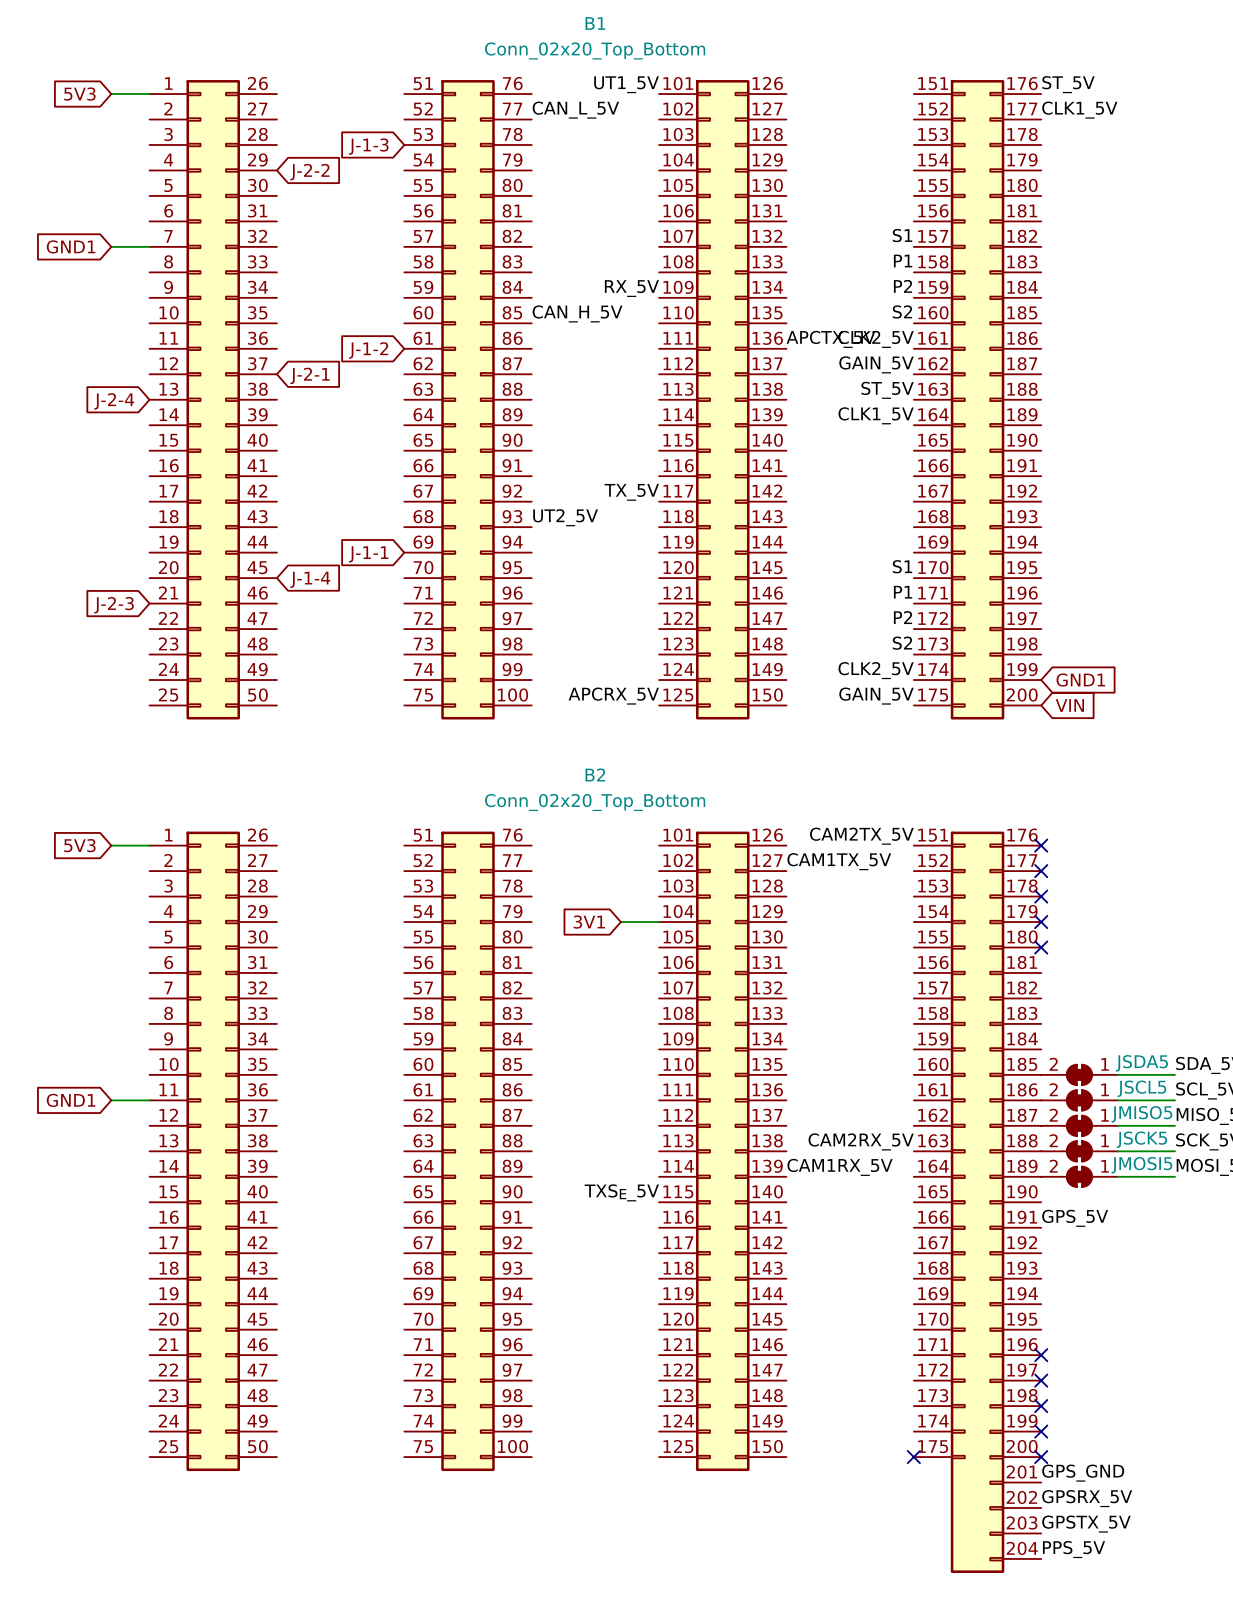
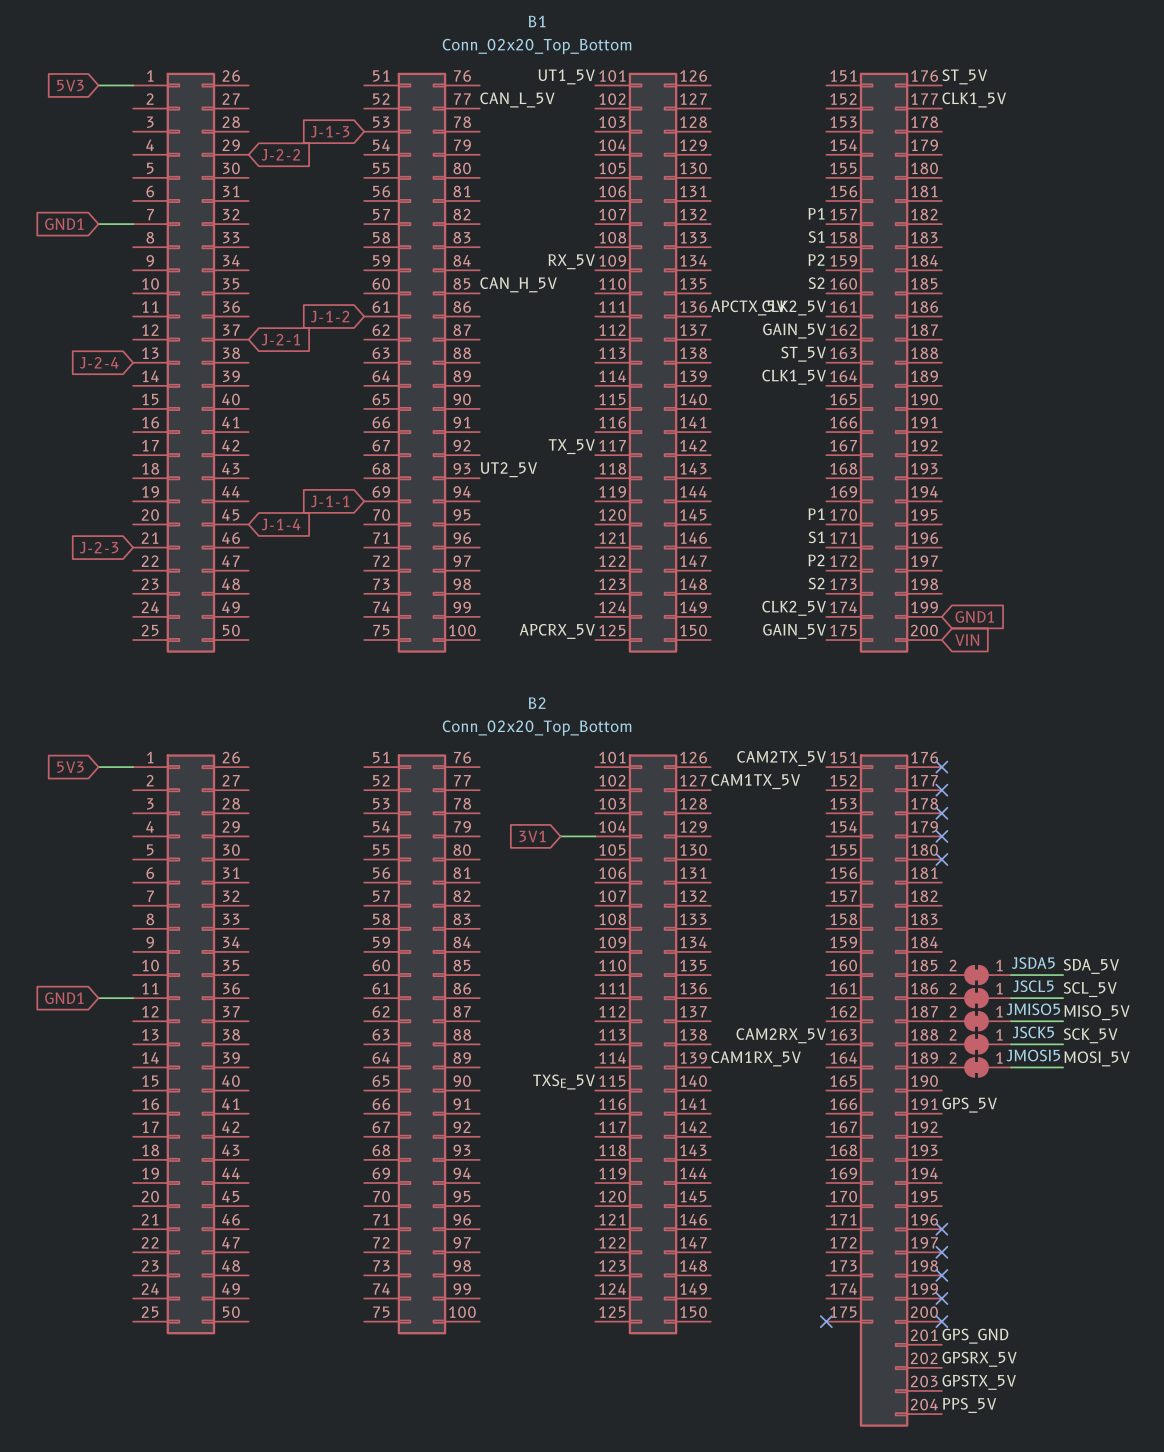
label: S1 (902, 235) -> P1 (816, 213)
label: P1 (903, 261) -> S1 (816, 236)
label: S1 (902, 566) -> P1 (816, 514)
label: P1 (903, 592) -> S1 (816, 537)

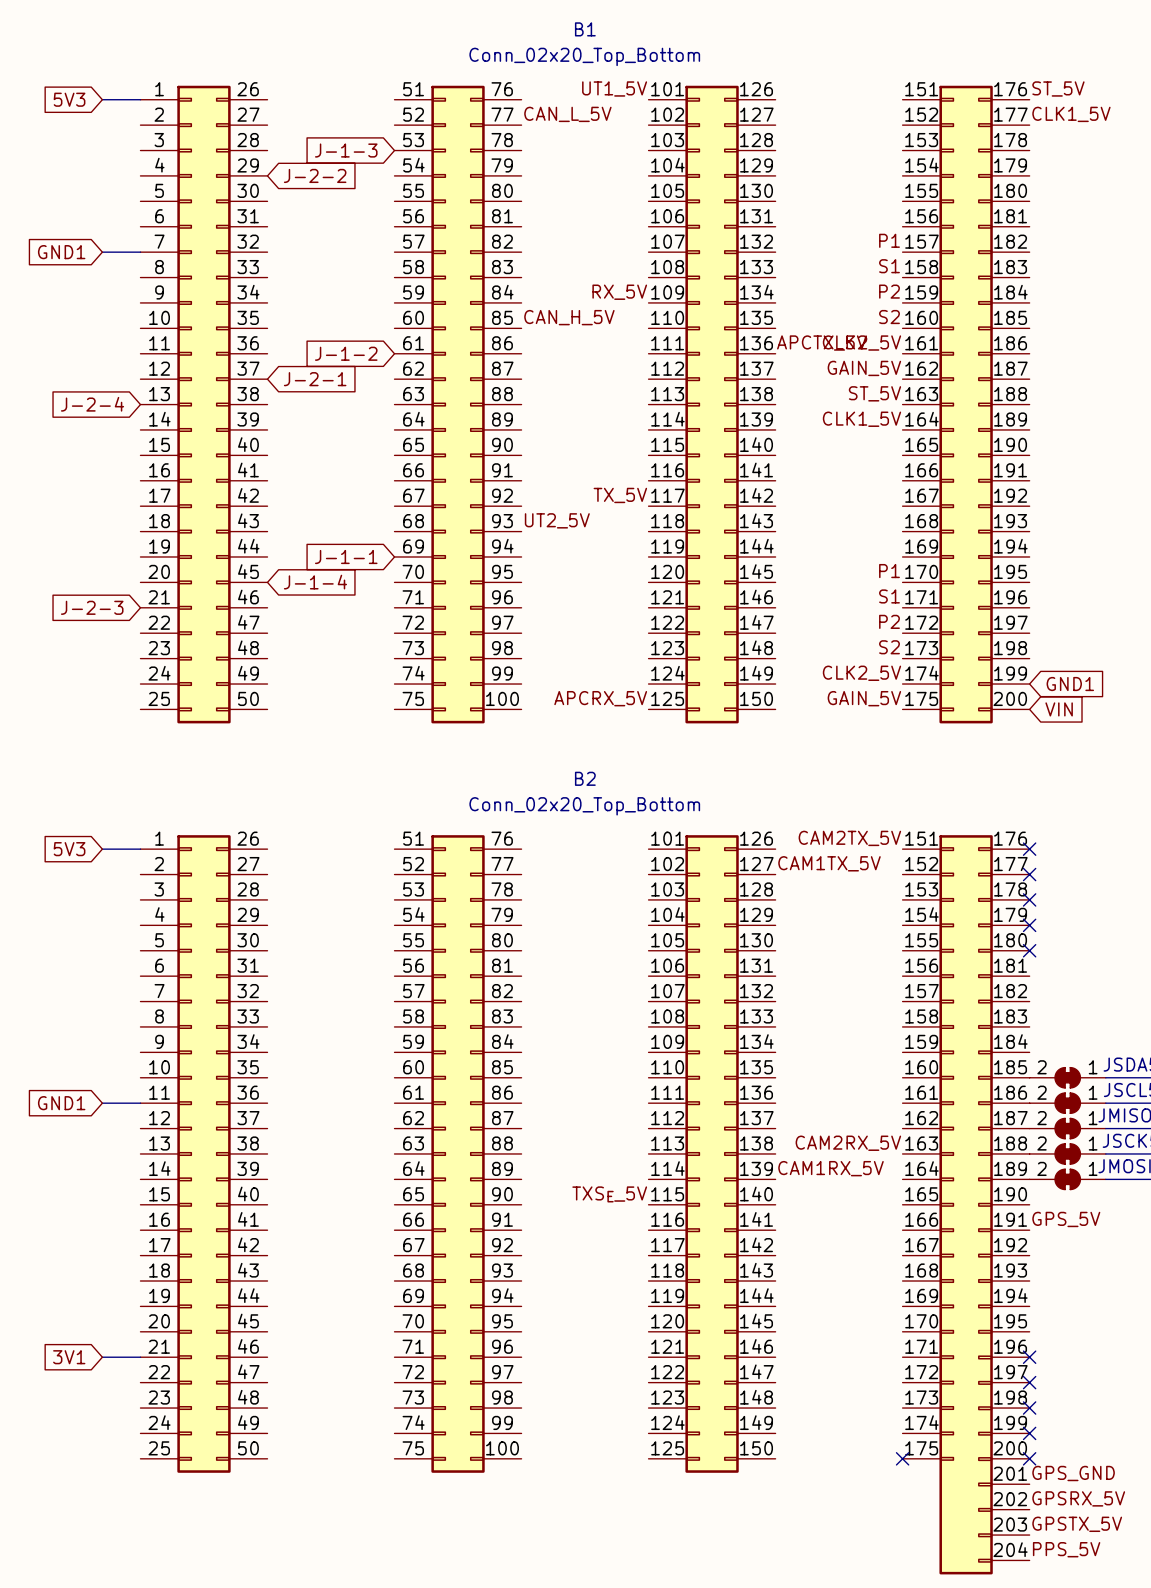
global label: 3V1 (532, 836) -> none
wire: (560, 836) (595, 836) -> none
global label: none -> 3V1 (69, 1357)
wire: none -> (102, 1357) (140, 1357)

